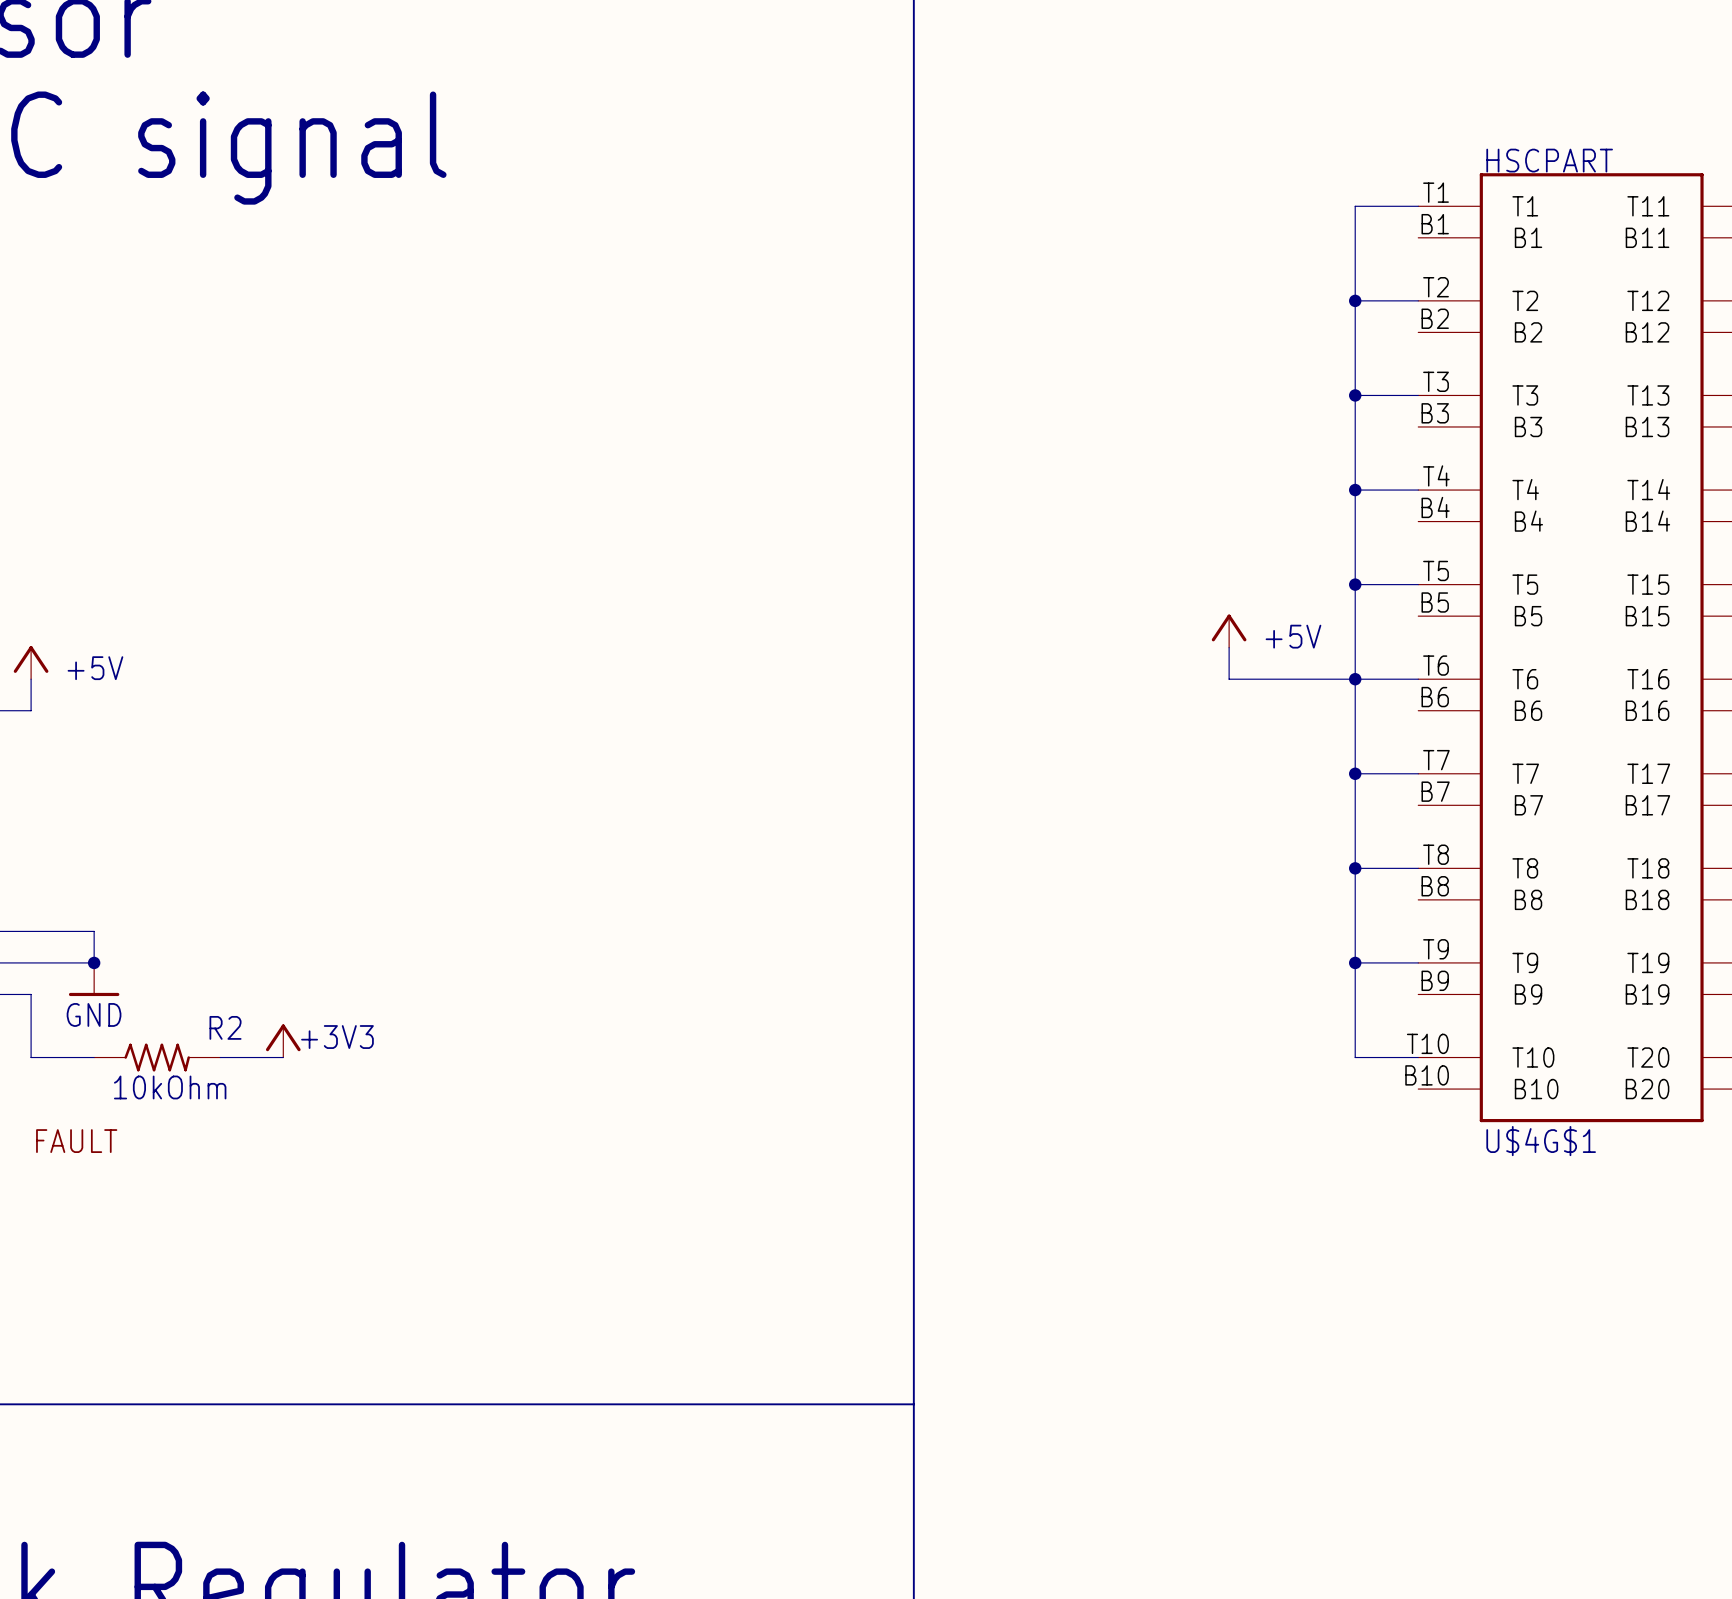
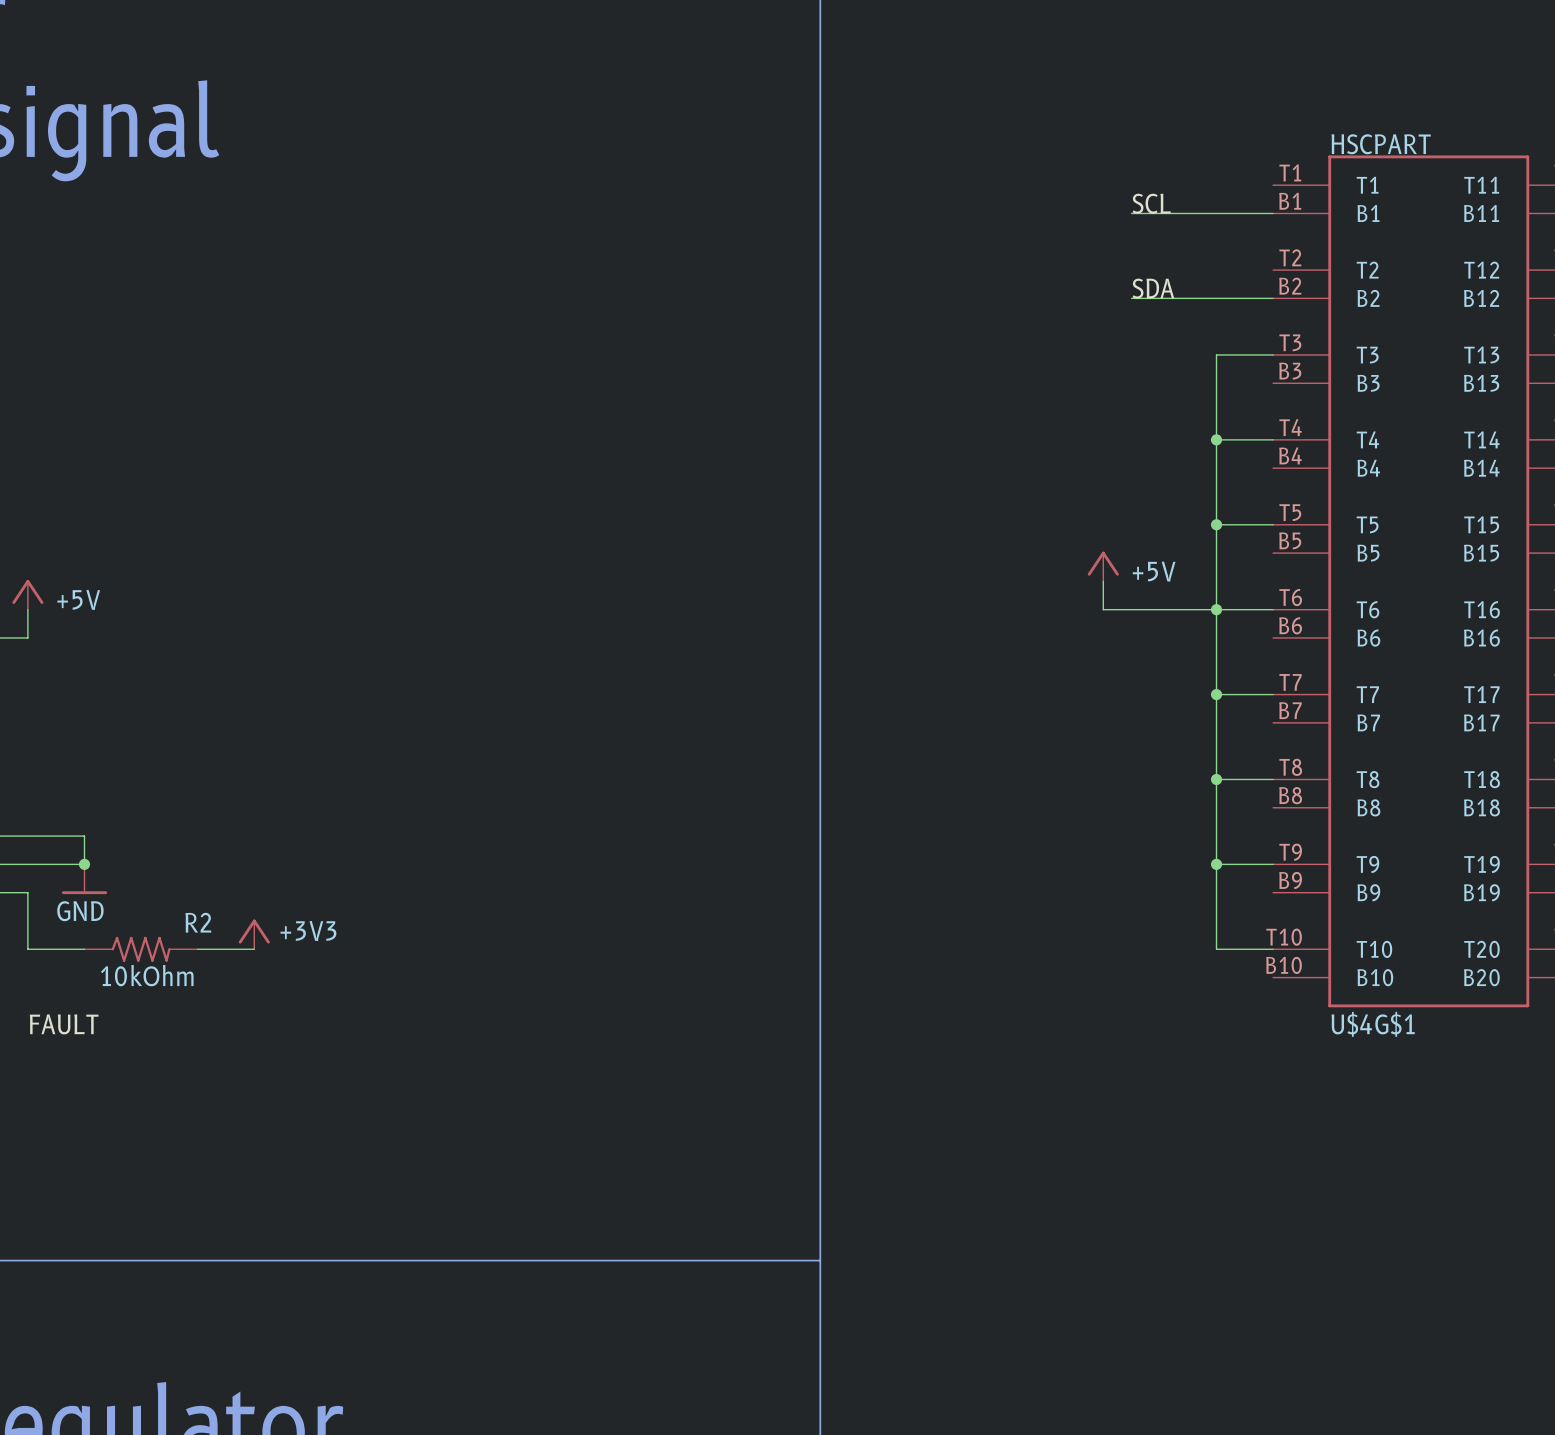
wire: (1418, 206) (1355, 206) (1355, 395) -> none
label: none -> SCL (1151, 203)
wire: none -> (1131, 213) (1273, 213)
wire: (1355, 300) (1418, 300) -> none
junction: (1355, 300) -> none
label: none -> SDA (1153, 288)
wire: none -> (1131, 298) (1273, 298)
junction: (1355, 395) -> none

